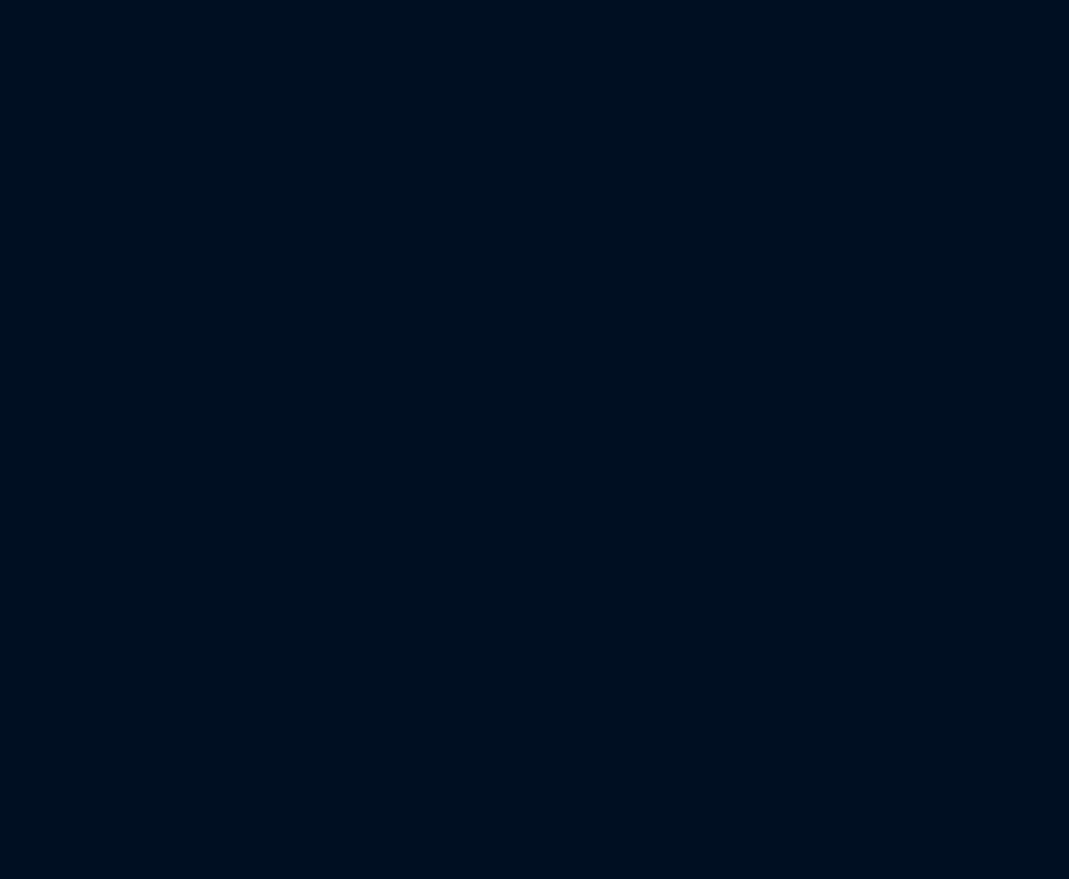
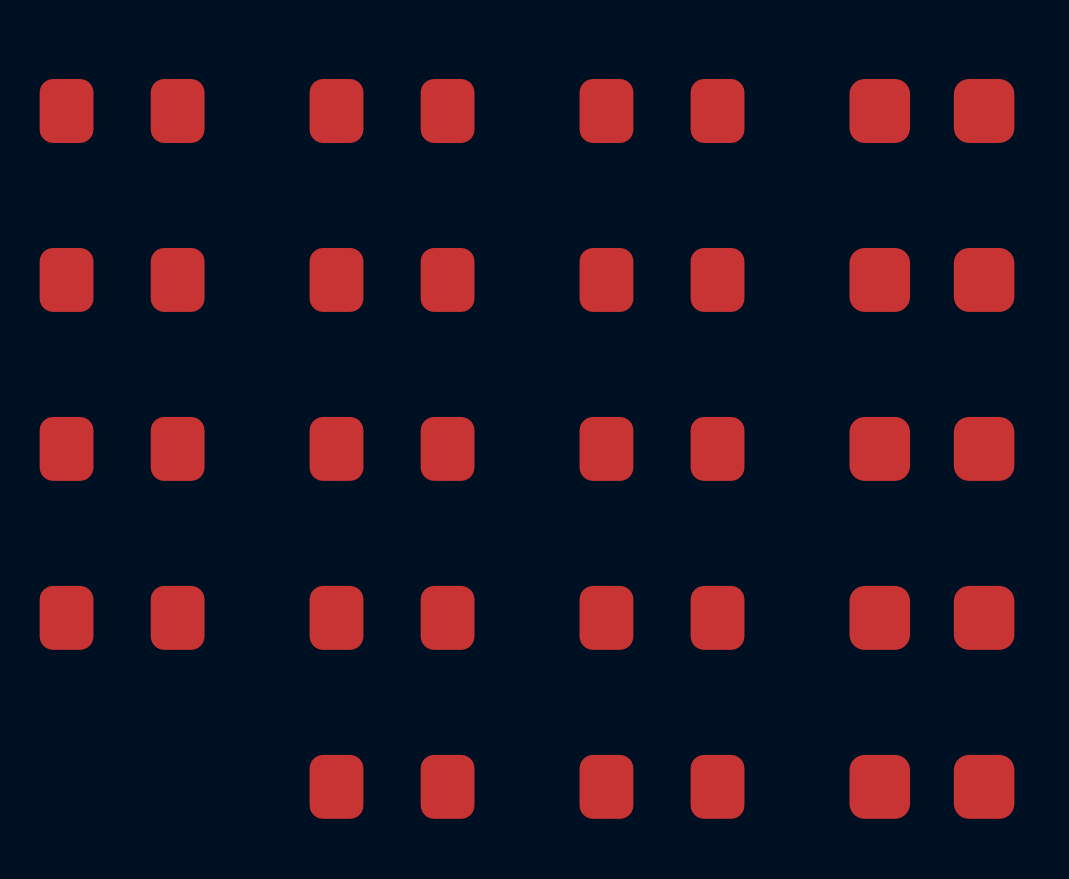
part: none -> (122, 110)
part: none -> (392, 110)
part: none -> (661, 110)
part: none -> (931, 110)
part: none -> (122, 279)
part: none -> (392, 279)
part: none -> (661, 279)
part: none -> (931, 279)
part: none -> (122, 448)
part: none -> (392, 448)
part: none -> (661, 448)
part: none -> (931, 448)
part: none -> (122, 617)
part: none -> (392, 617)
part: none -> (661, 617)
part: none -> (931, 617)
part: none -> (392, 786)
part: none -> (661, 786)
part: none -> (931, 786)

